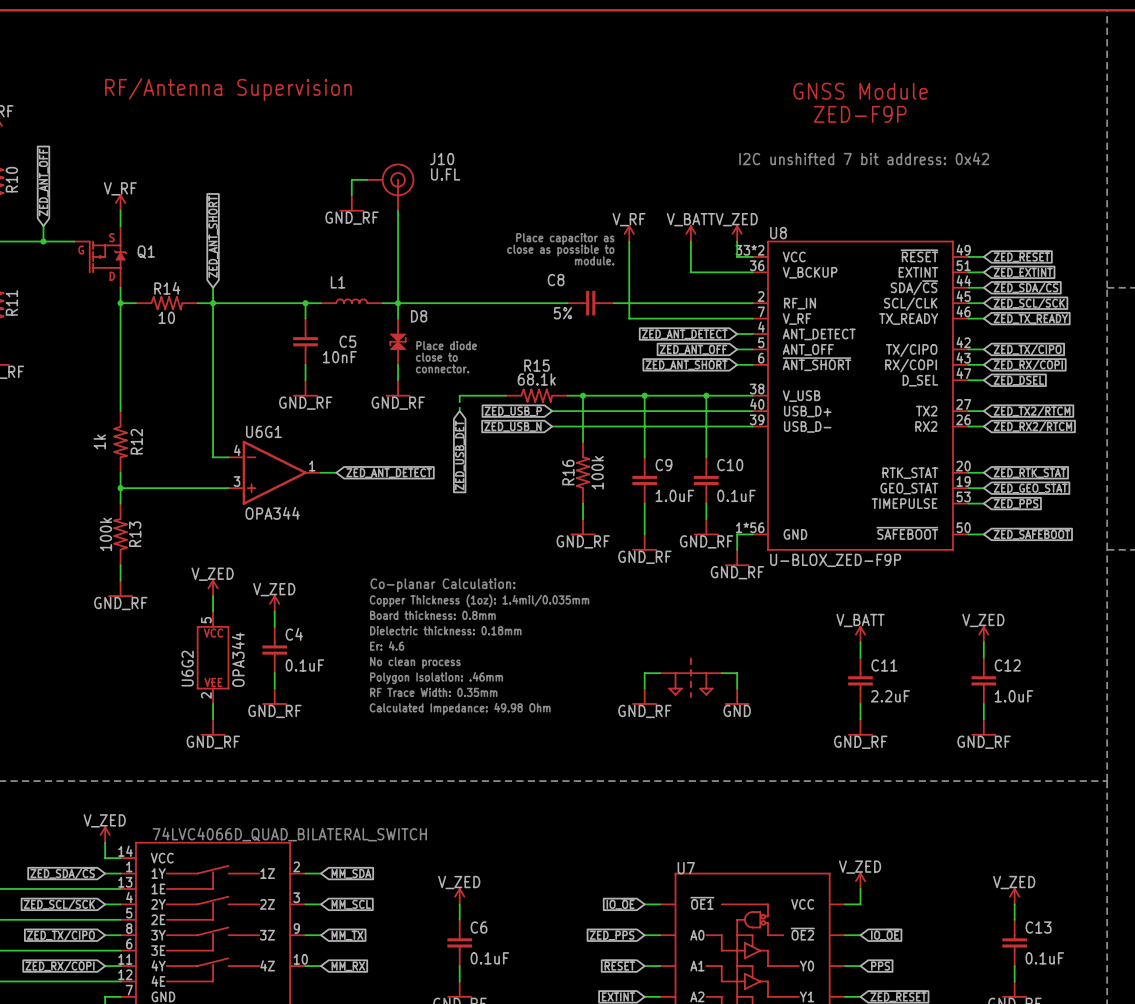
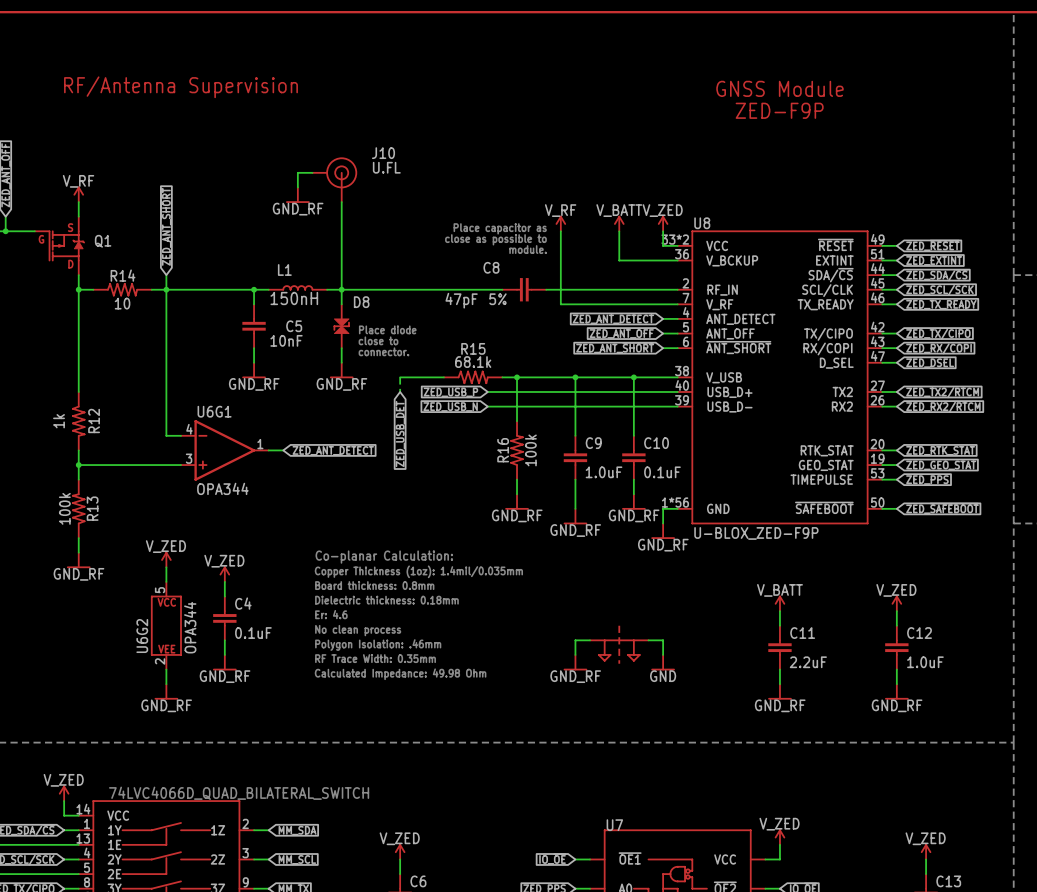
text: I2C unshifted 7 bit address: 0x42 (864, 158) -> none
L1 text: none -> 150nH (294, 298)
C8 text: none -> 47pF (461, 300)

